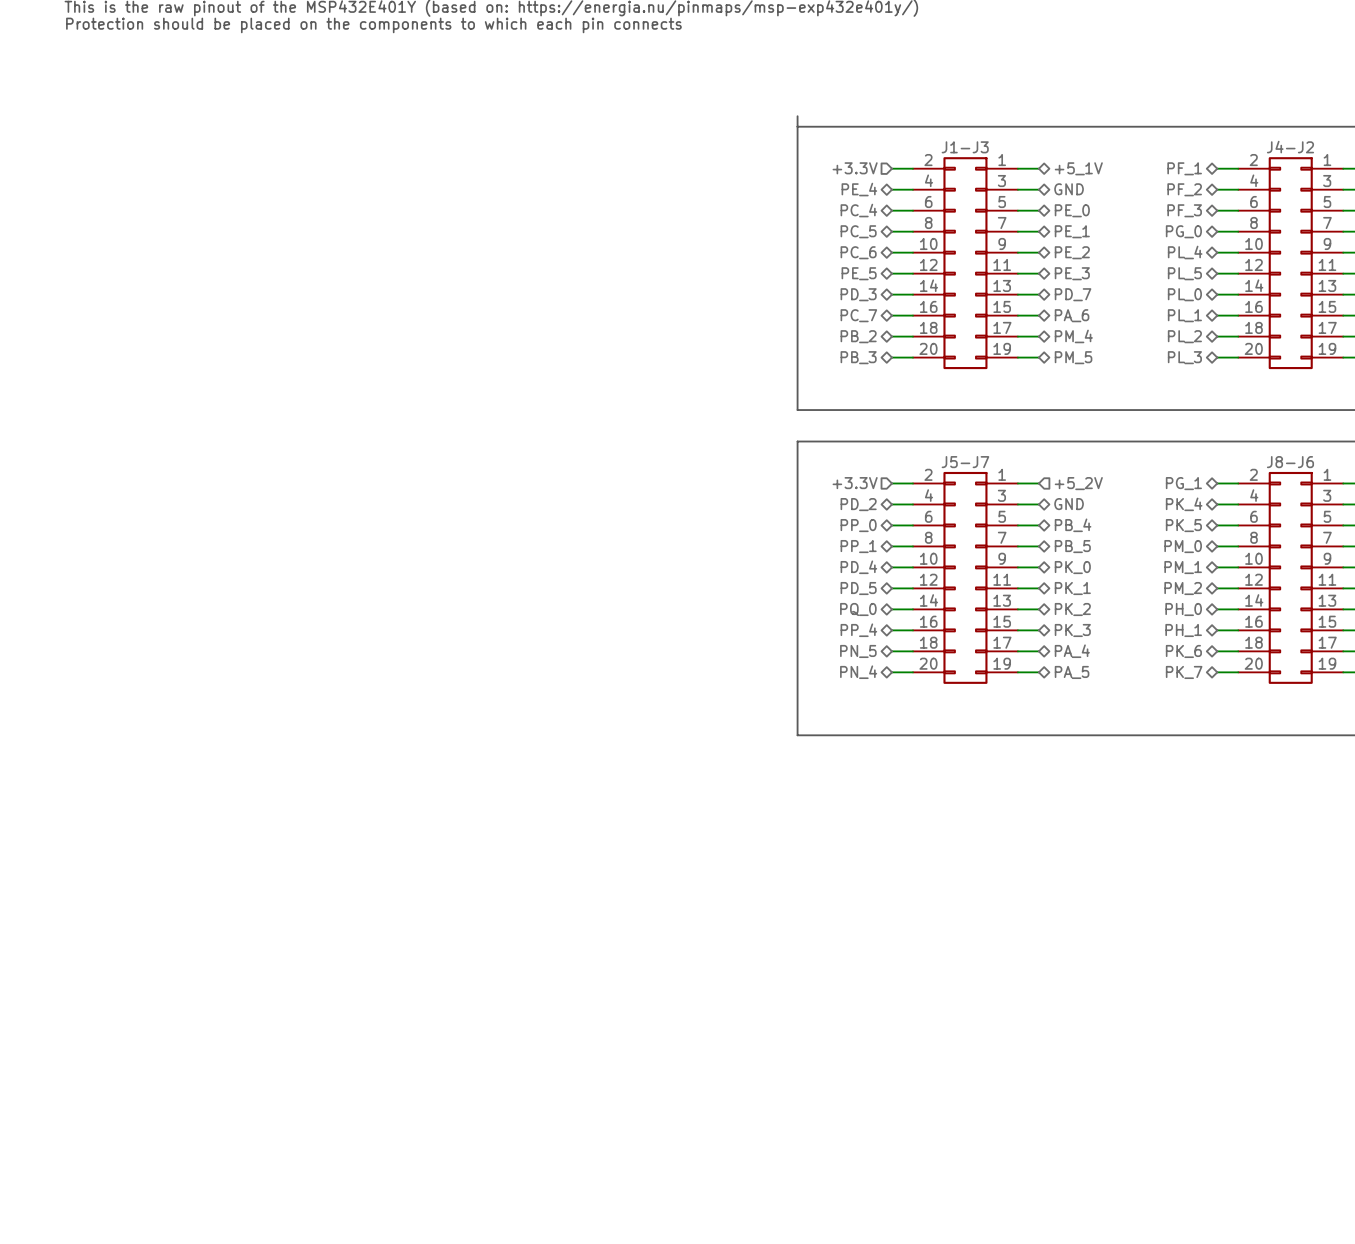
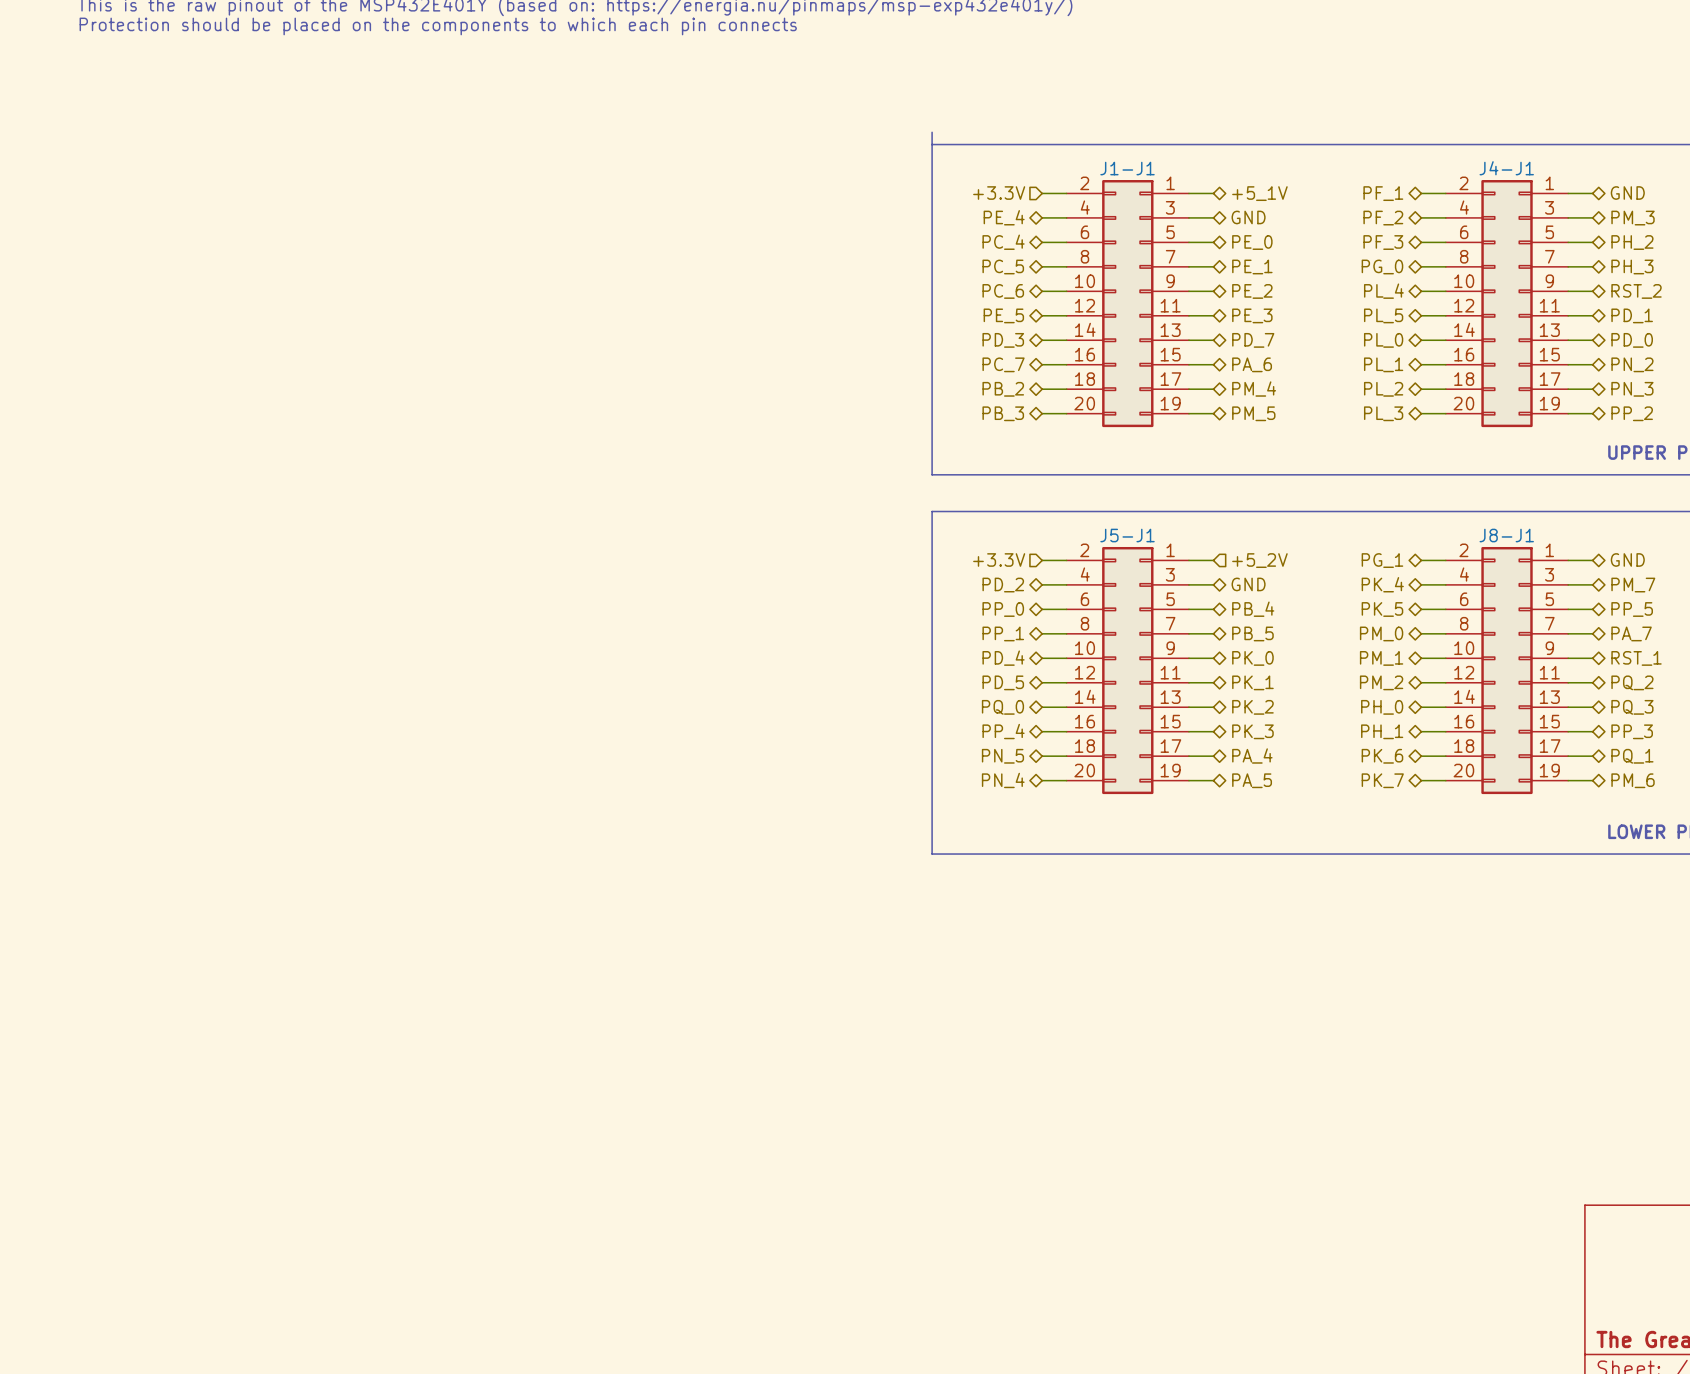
J1-J3 name: J1-J3 (965, 147) -> J1-J1 (1127, 168)
J4-J2 name: J4-J2 (1290, 147) -> J4-J1 (1506, 168)
J5-J7 name: J5-J7 (965, 462) -> J5-J1 (1127, 535)
J8-J6 name: J8-J6 (1290, 462) -> J8-J1 (1506, 535)

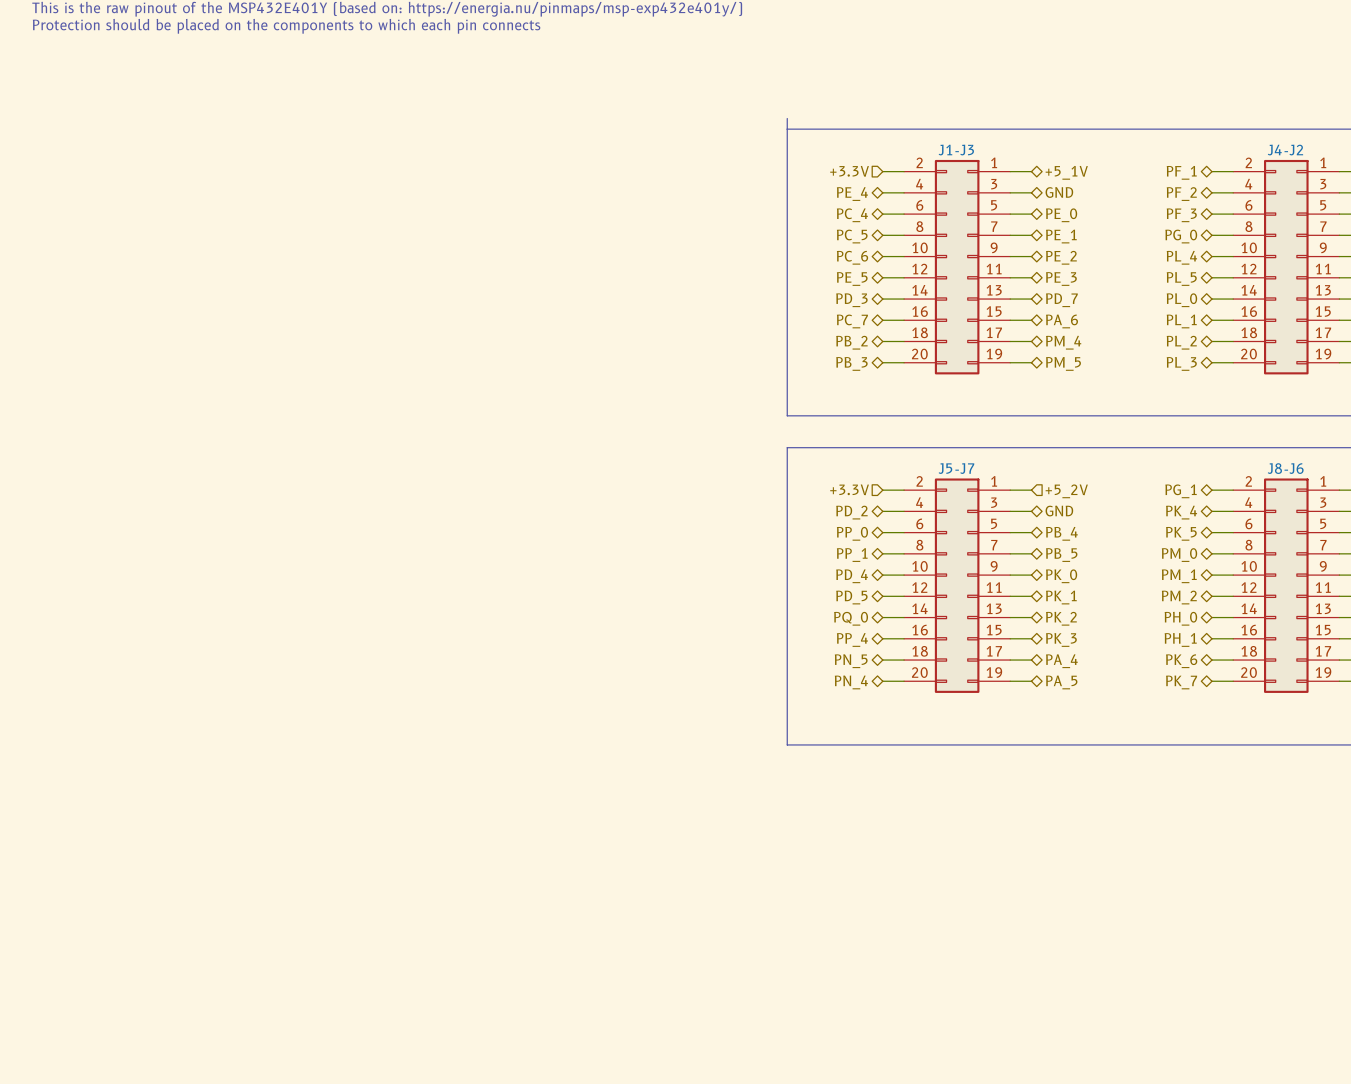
J1-J1 name: J1-J1 (1127, 168) -> J1-J3 (956, 150)
J4-J1 name: J4-J1 (1506, 168) -> J4-J2 (1285, 150)
J5-J1 name: J5-J1 (1127, 535) -> J5-J7 (956, 468)
J8-J1 name: J8-J1 (1506, 535) -> J8-J6 (1285, 468)

